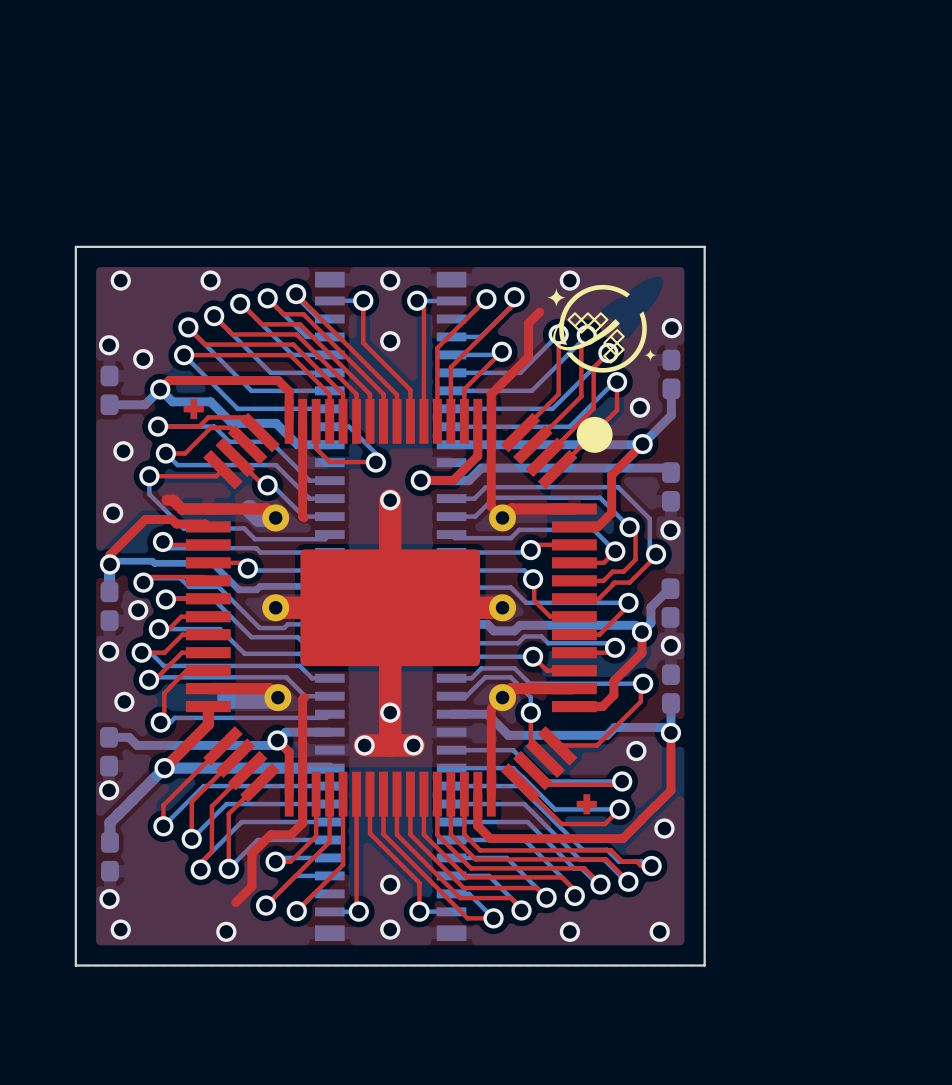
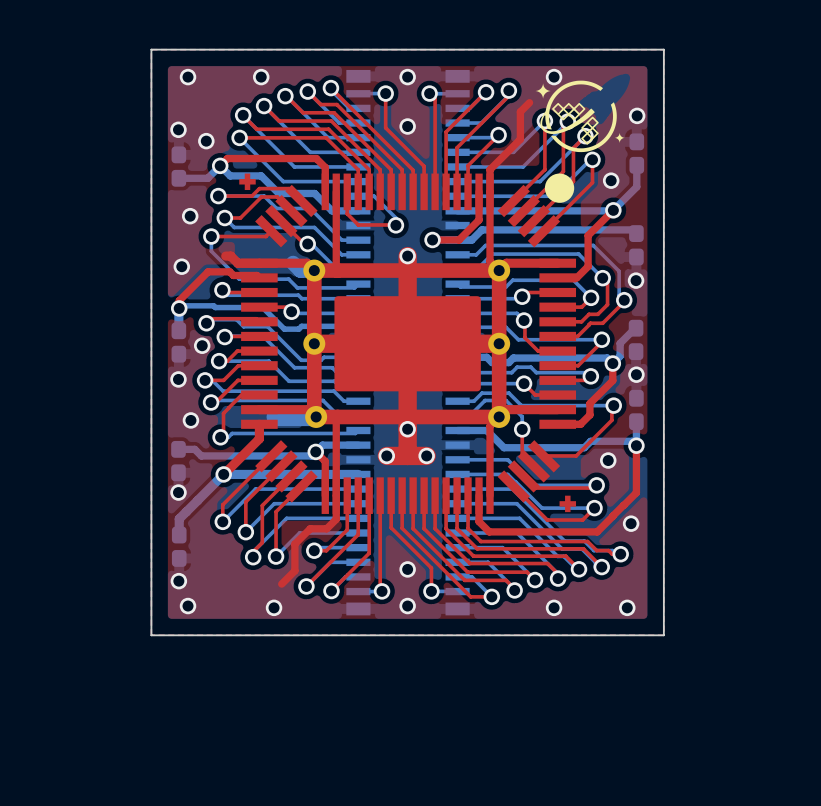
part footprint: [183, 398, 613, 817] -> [239, 173, 577, 514]
top track: none -> (314, 415) (314, 270) (499, 270) (499, 416) (316, 416)

